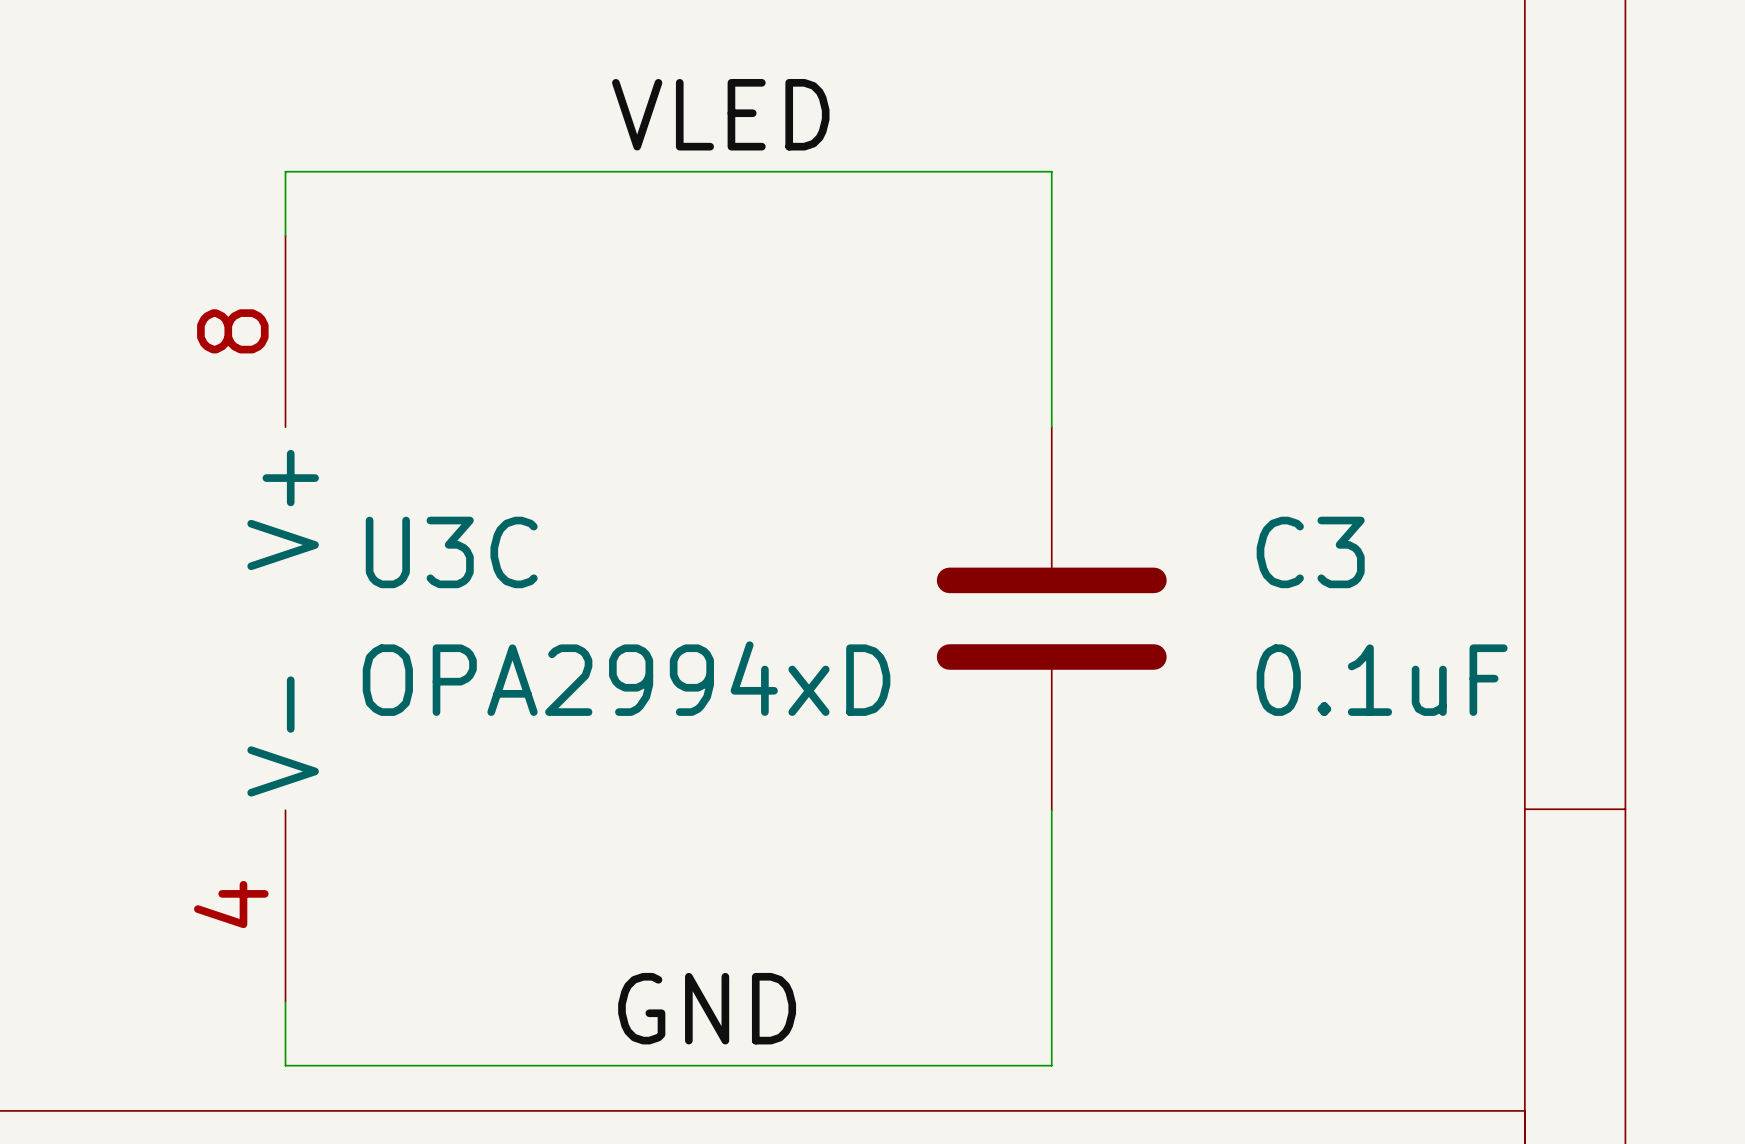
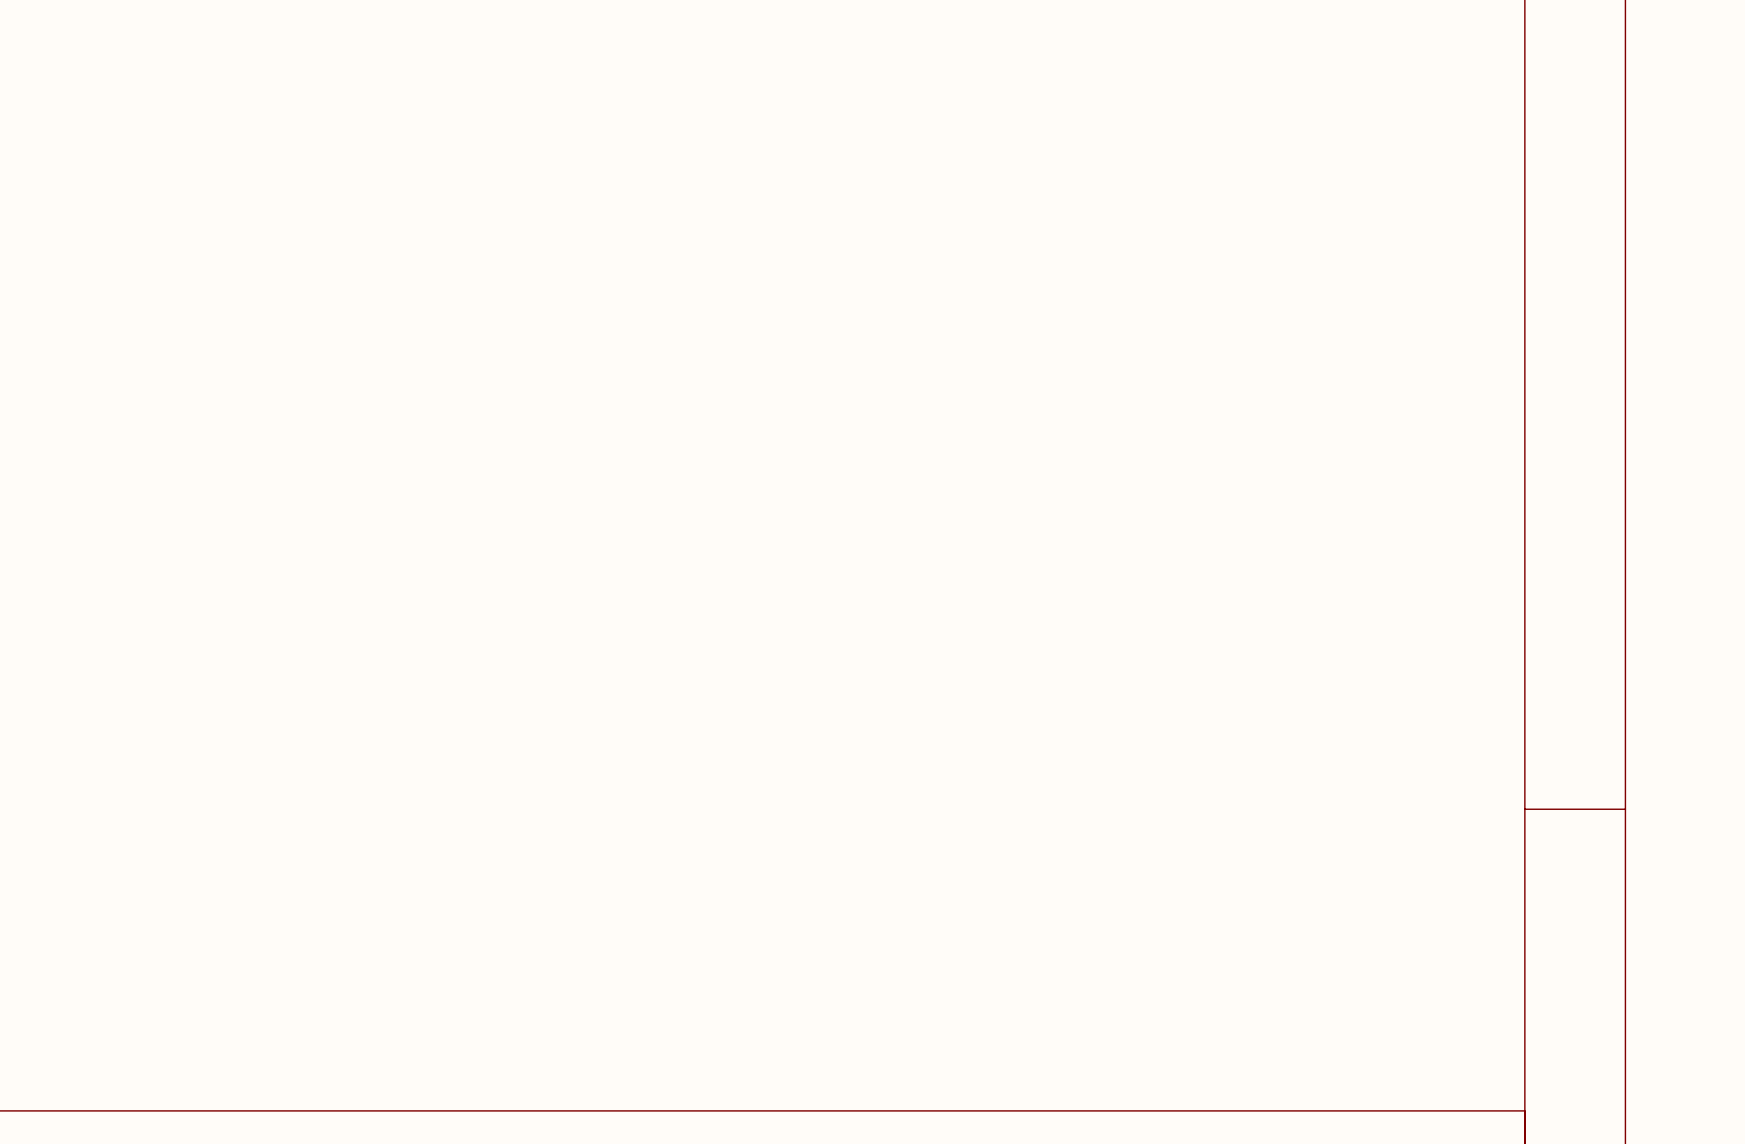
label: VLED (720, 114) -> none
wire: (285, 235) (285, 171) (1051, 171) (1051, 427) -> none
U3C: OPA2994xD (285, 618) -> none
C3: 0.1uF (1051, 618) -> none
wire: (1051, 810) (1051, 1065) (285, 1065) (285, 1001) -> none
label: GND (707, 1008) -> none

